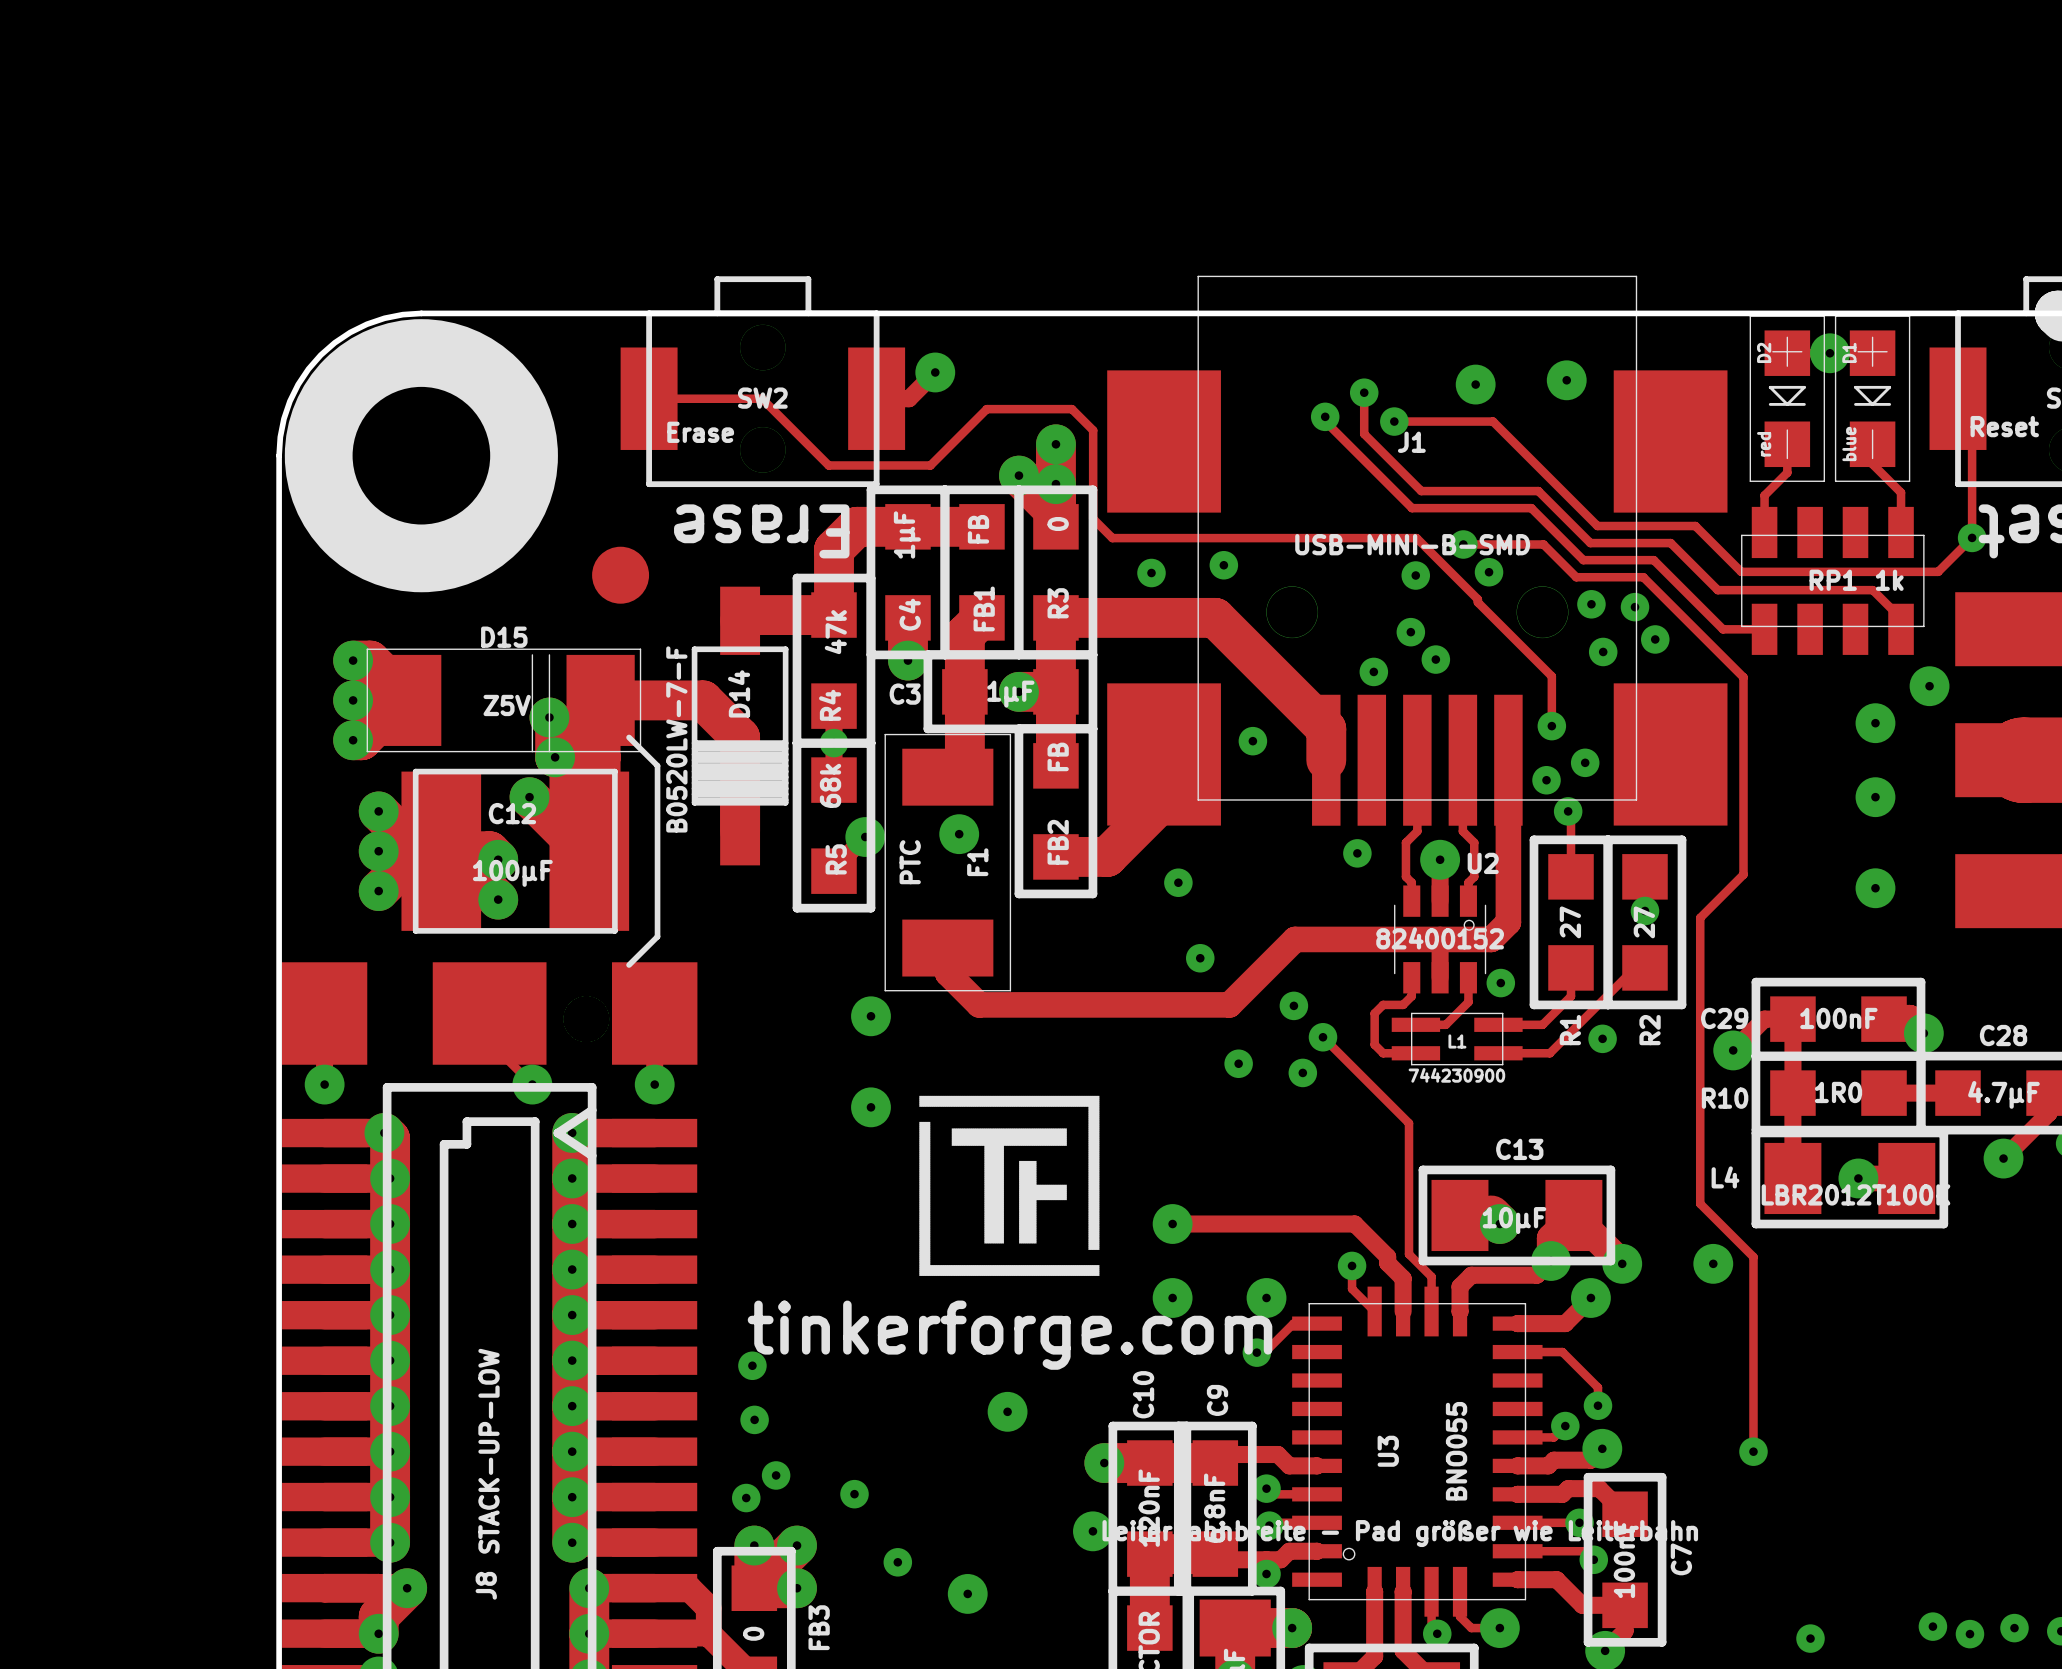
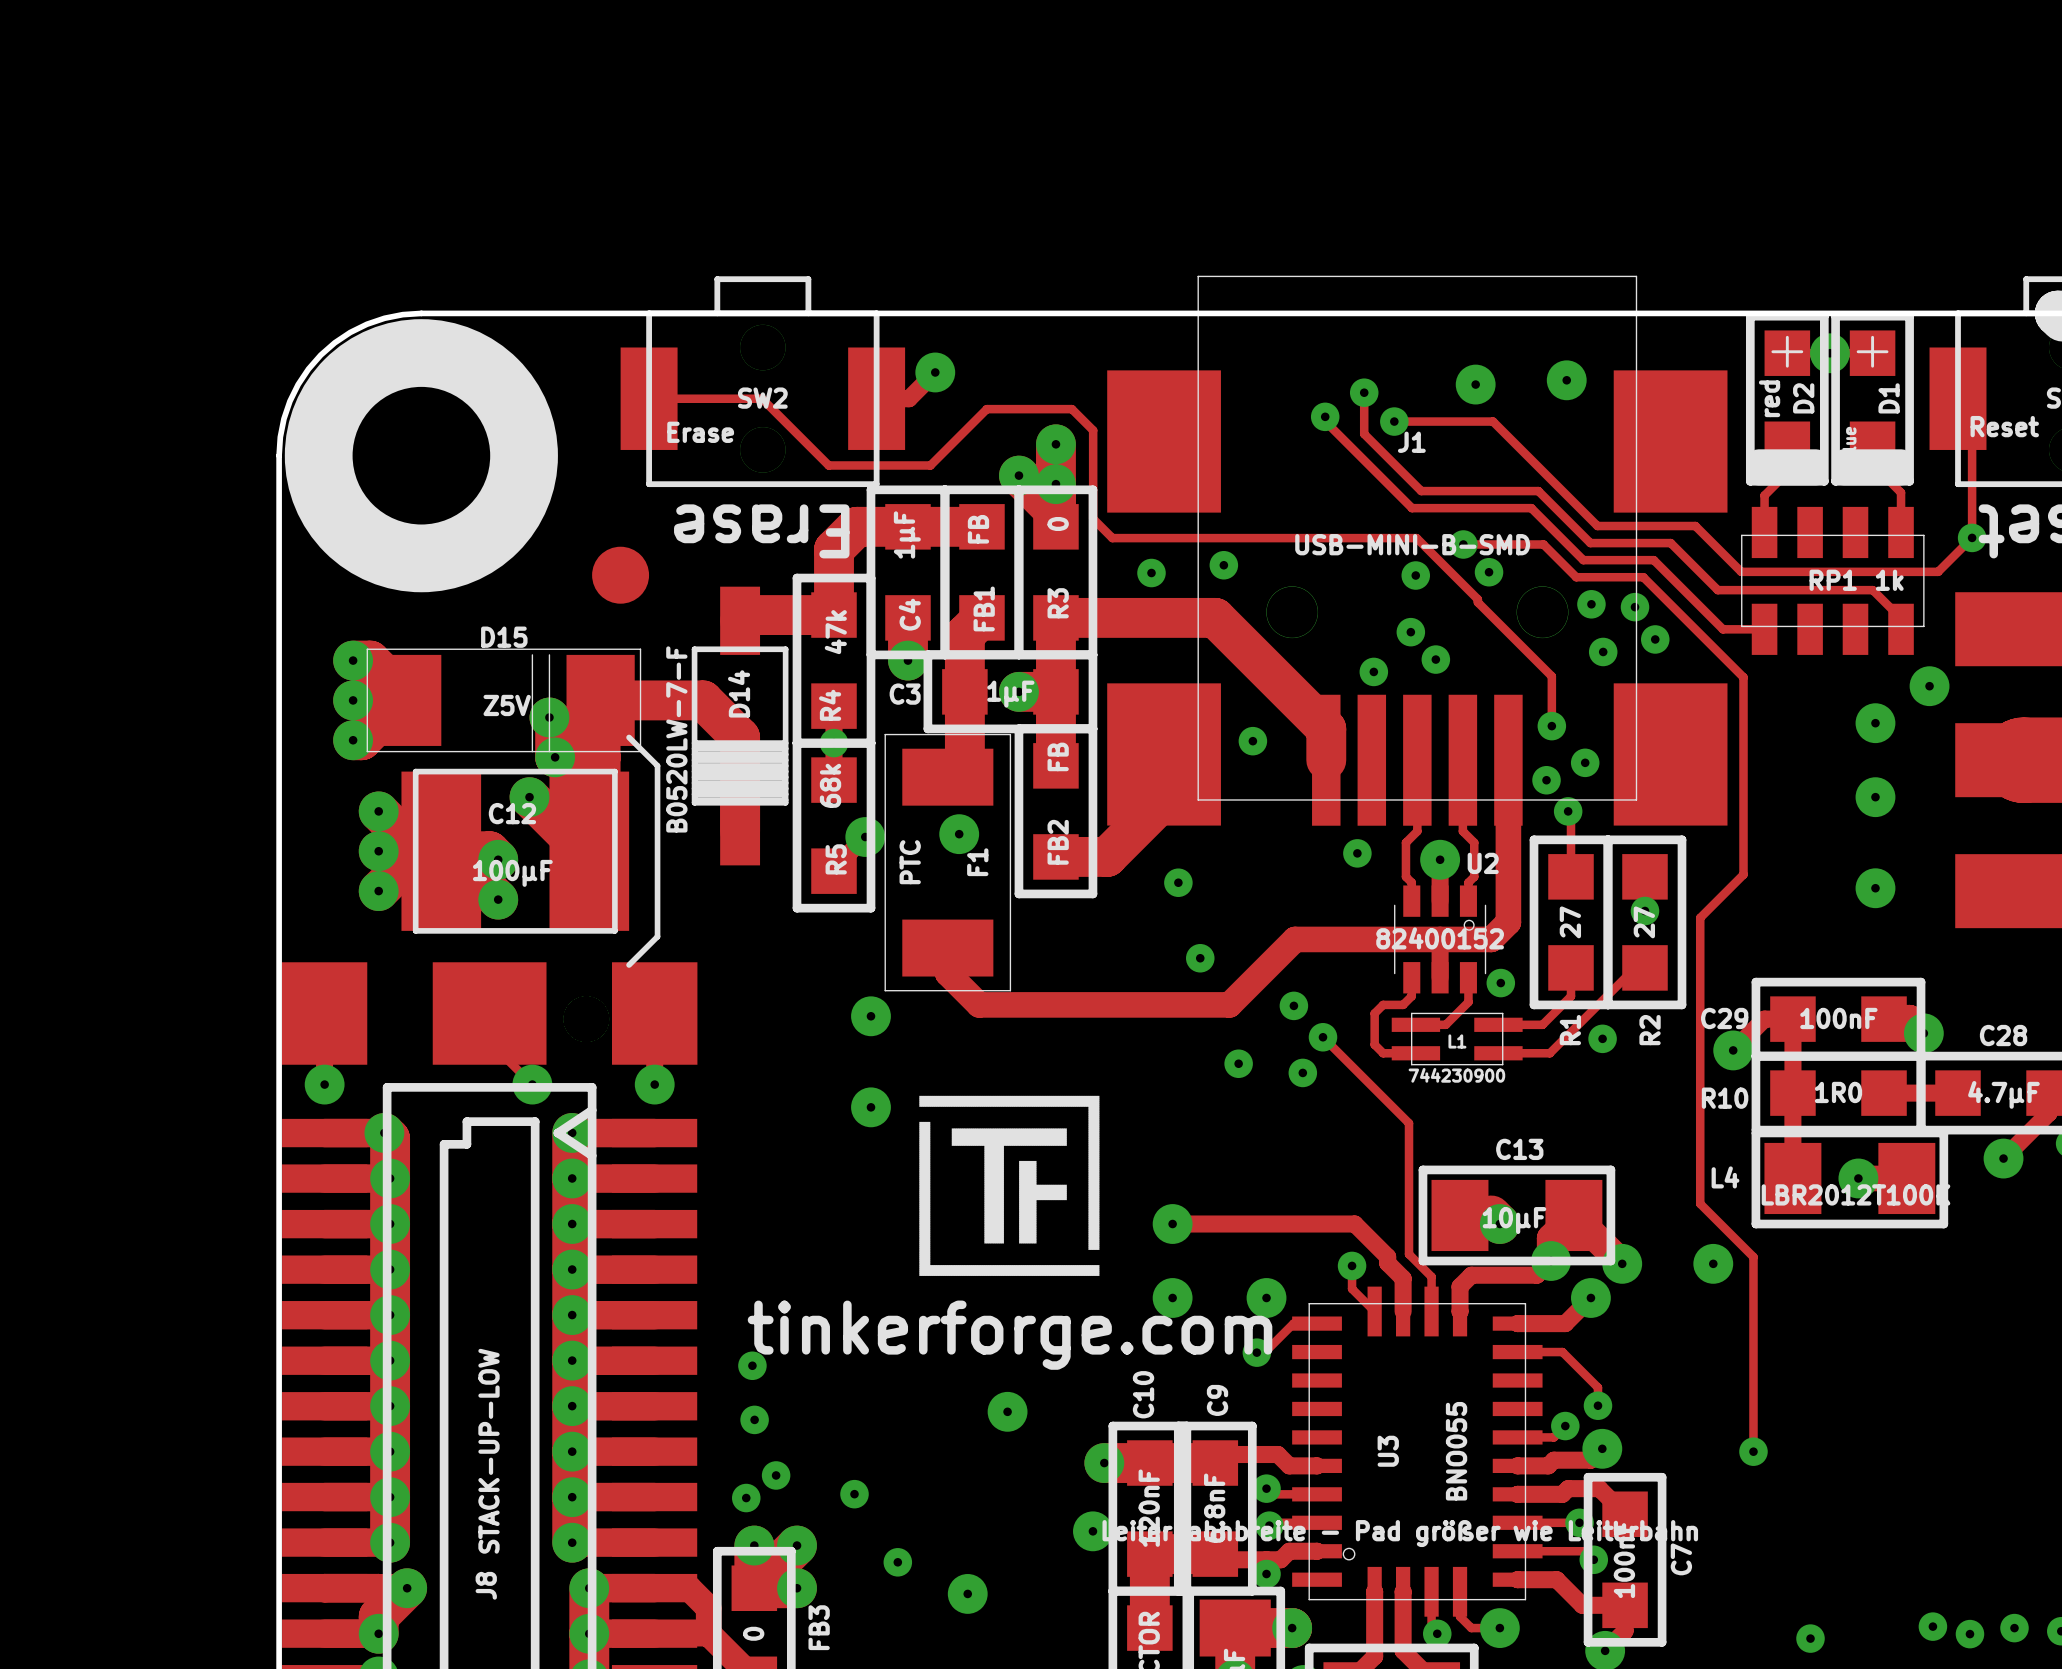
D2 footprint: [1750, 316, 1825, 482] -> [1745, 311, 1829, 486]
D1 footprint: [1835, 316, 1910, 482] -> [1831, 311, 1914, 486]
D2 name position: D2 (1764, 352) -> D2 (1803, 398)
D1 name position: D1 (1849, 352) -> D1 (1889, 398)
D2 value position: red (1764, 444) -> red (1769, 398)

